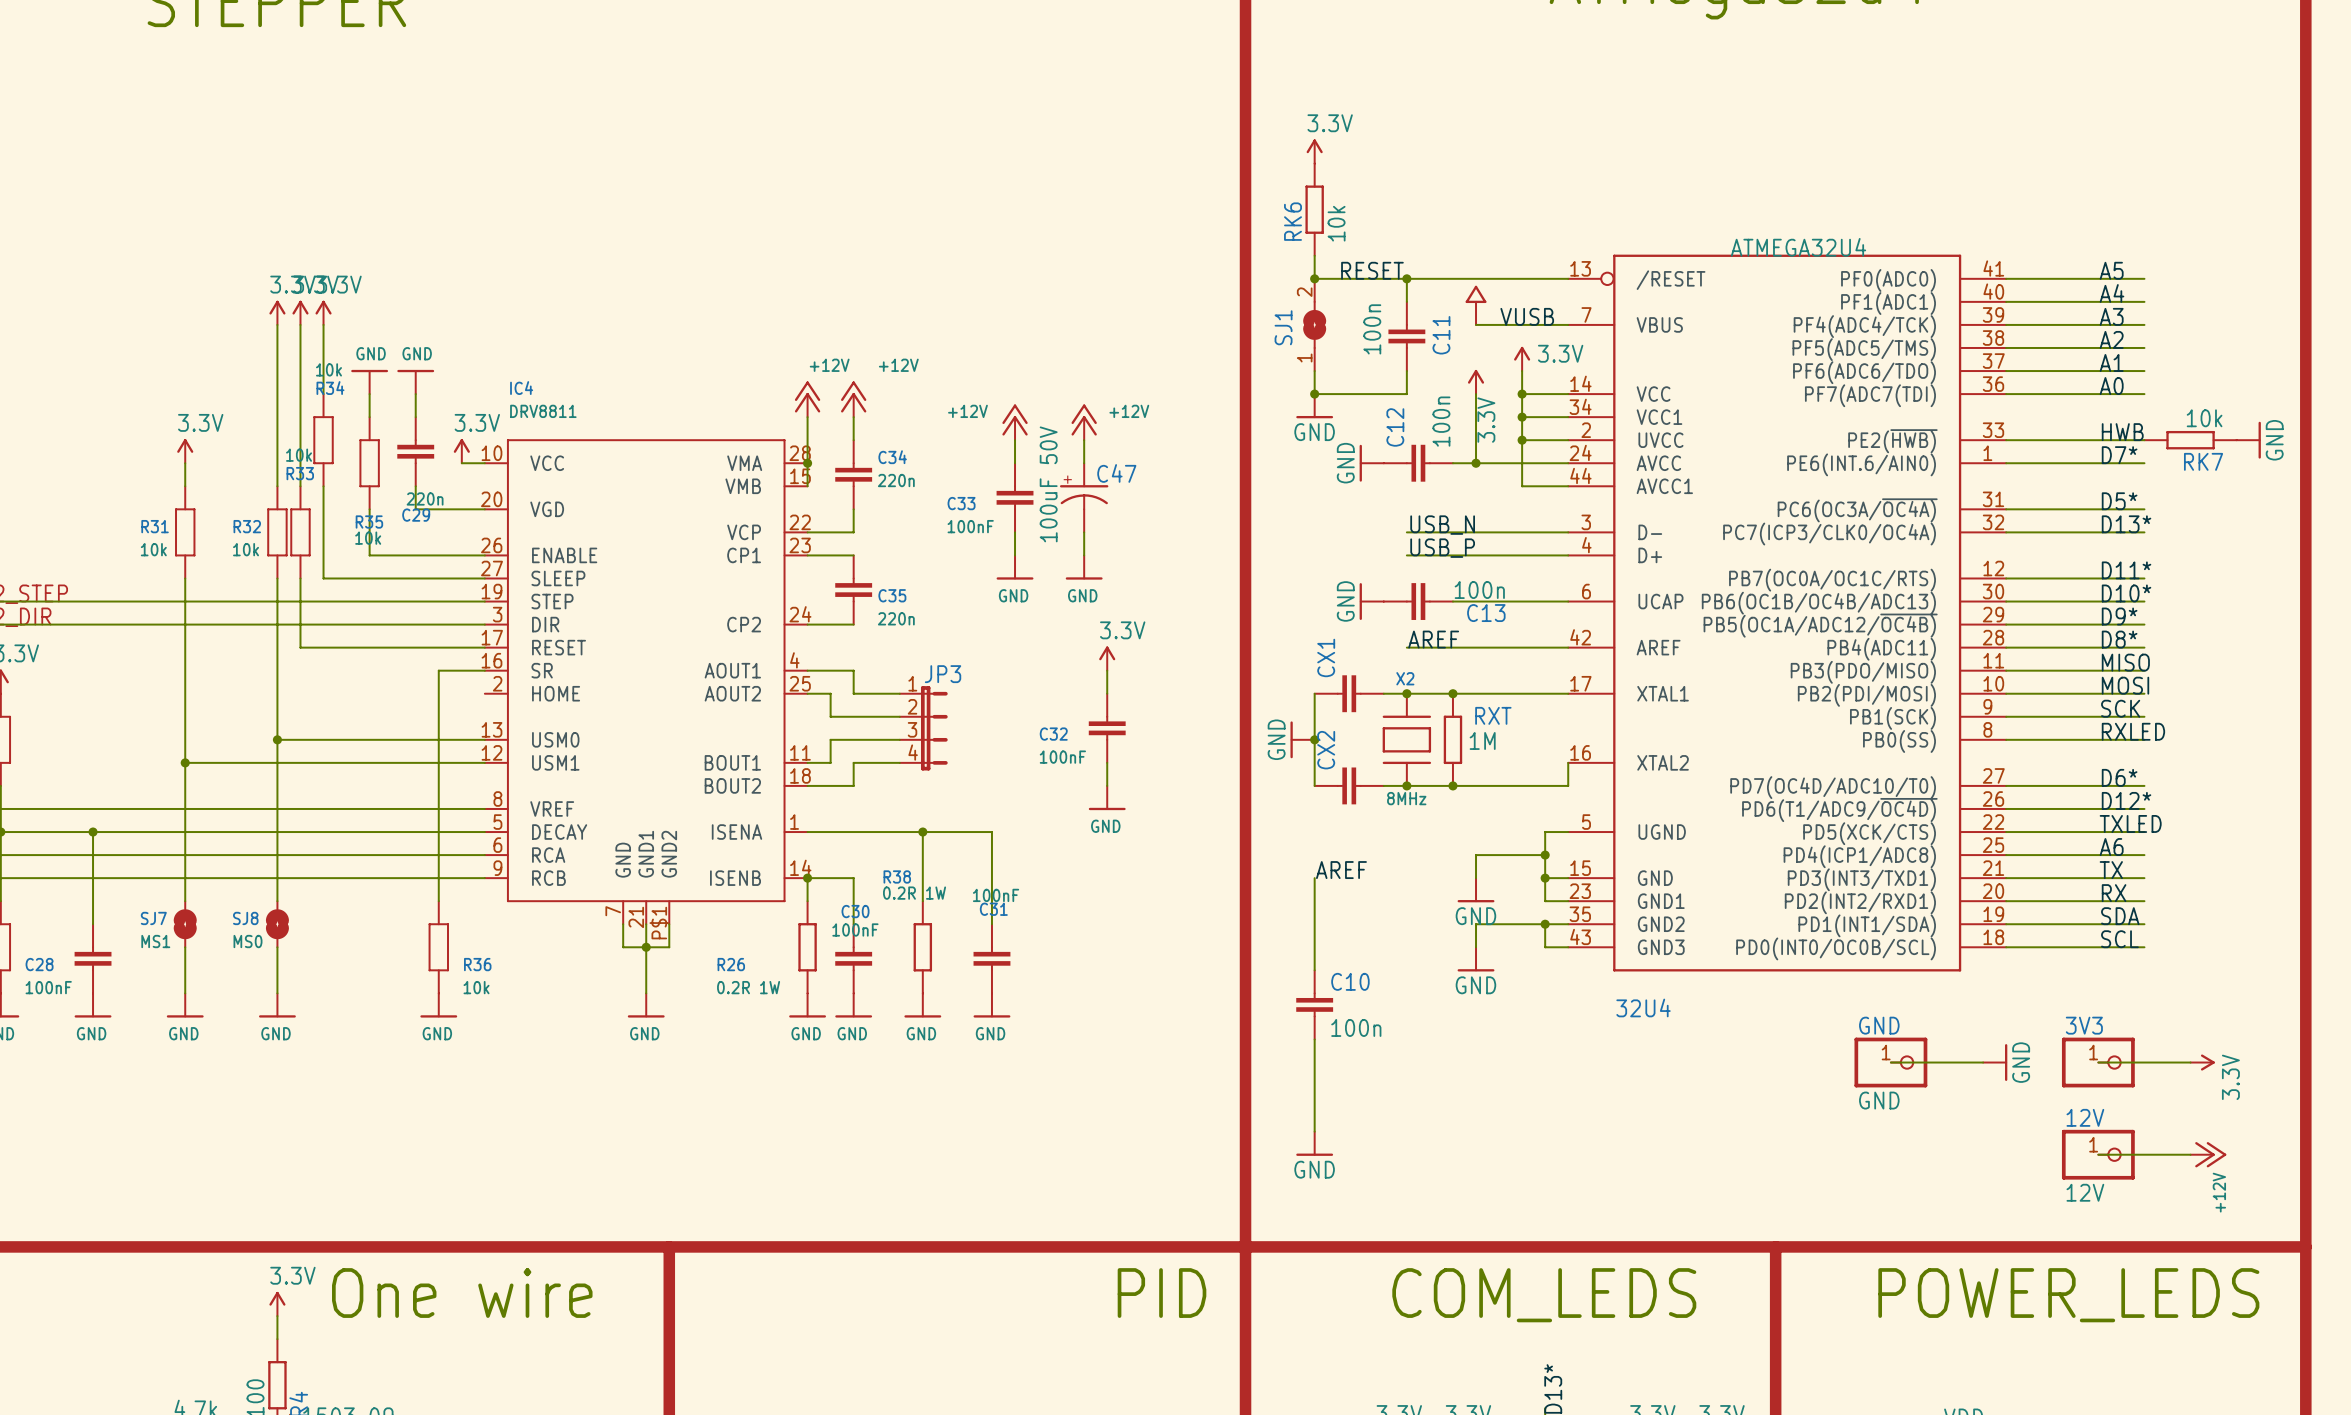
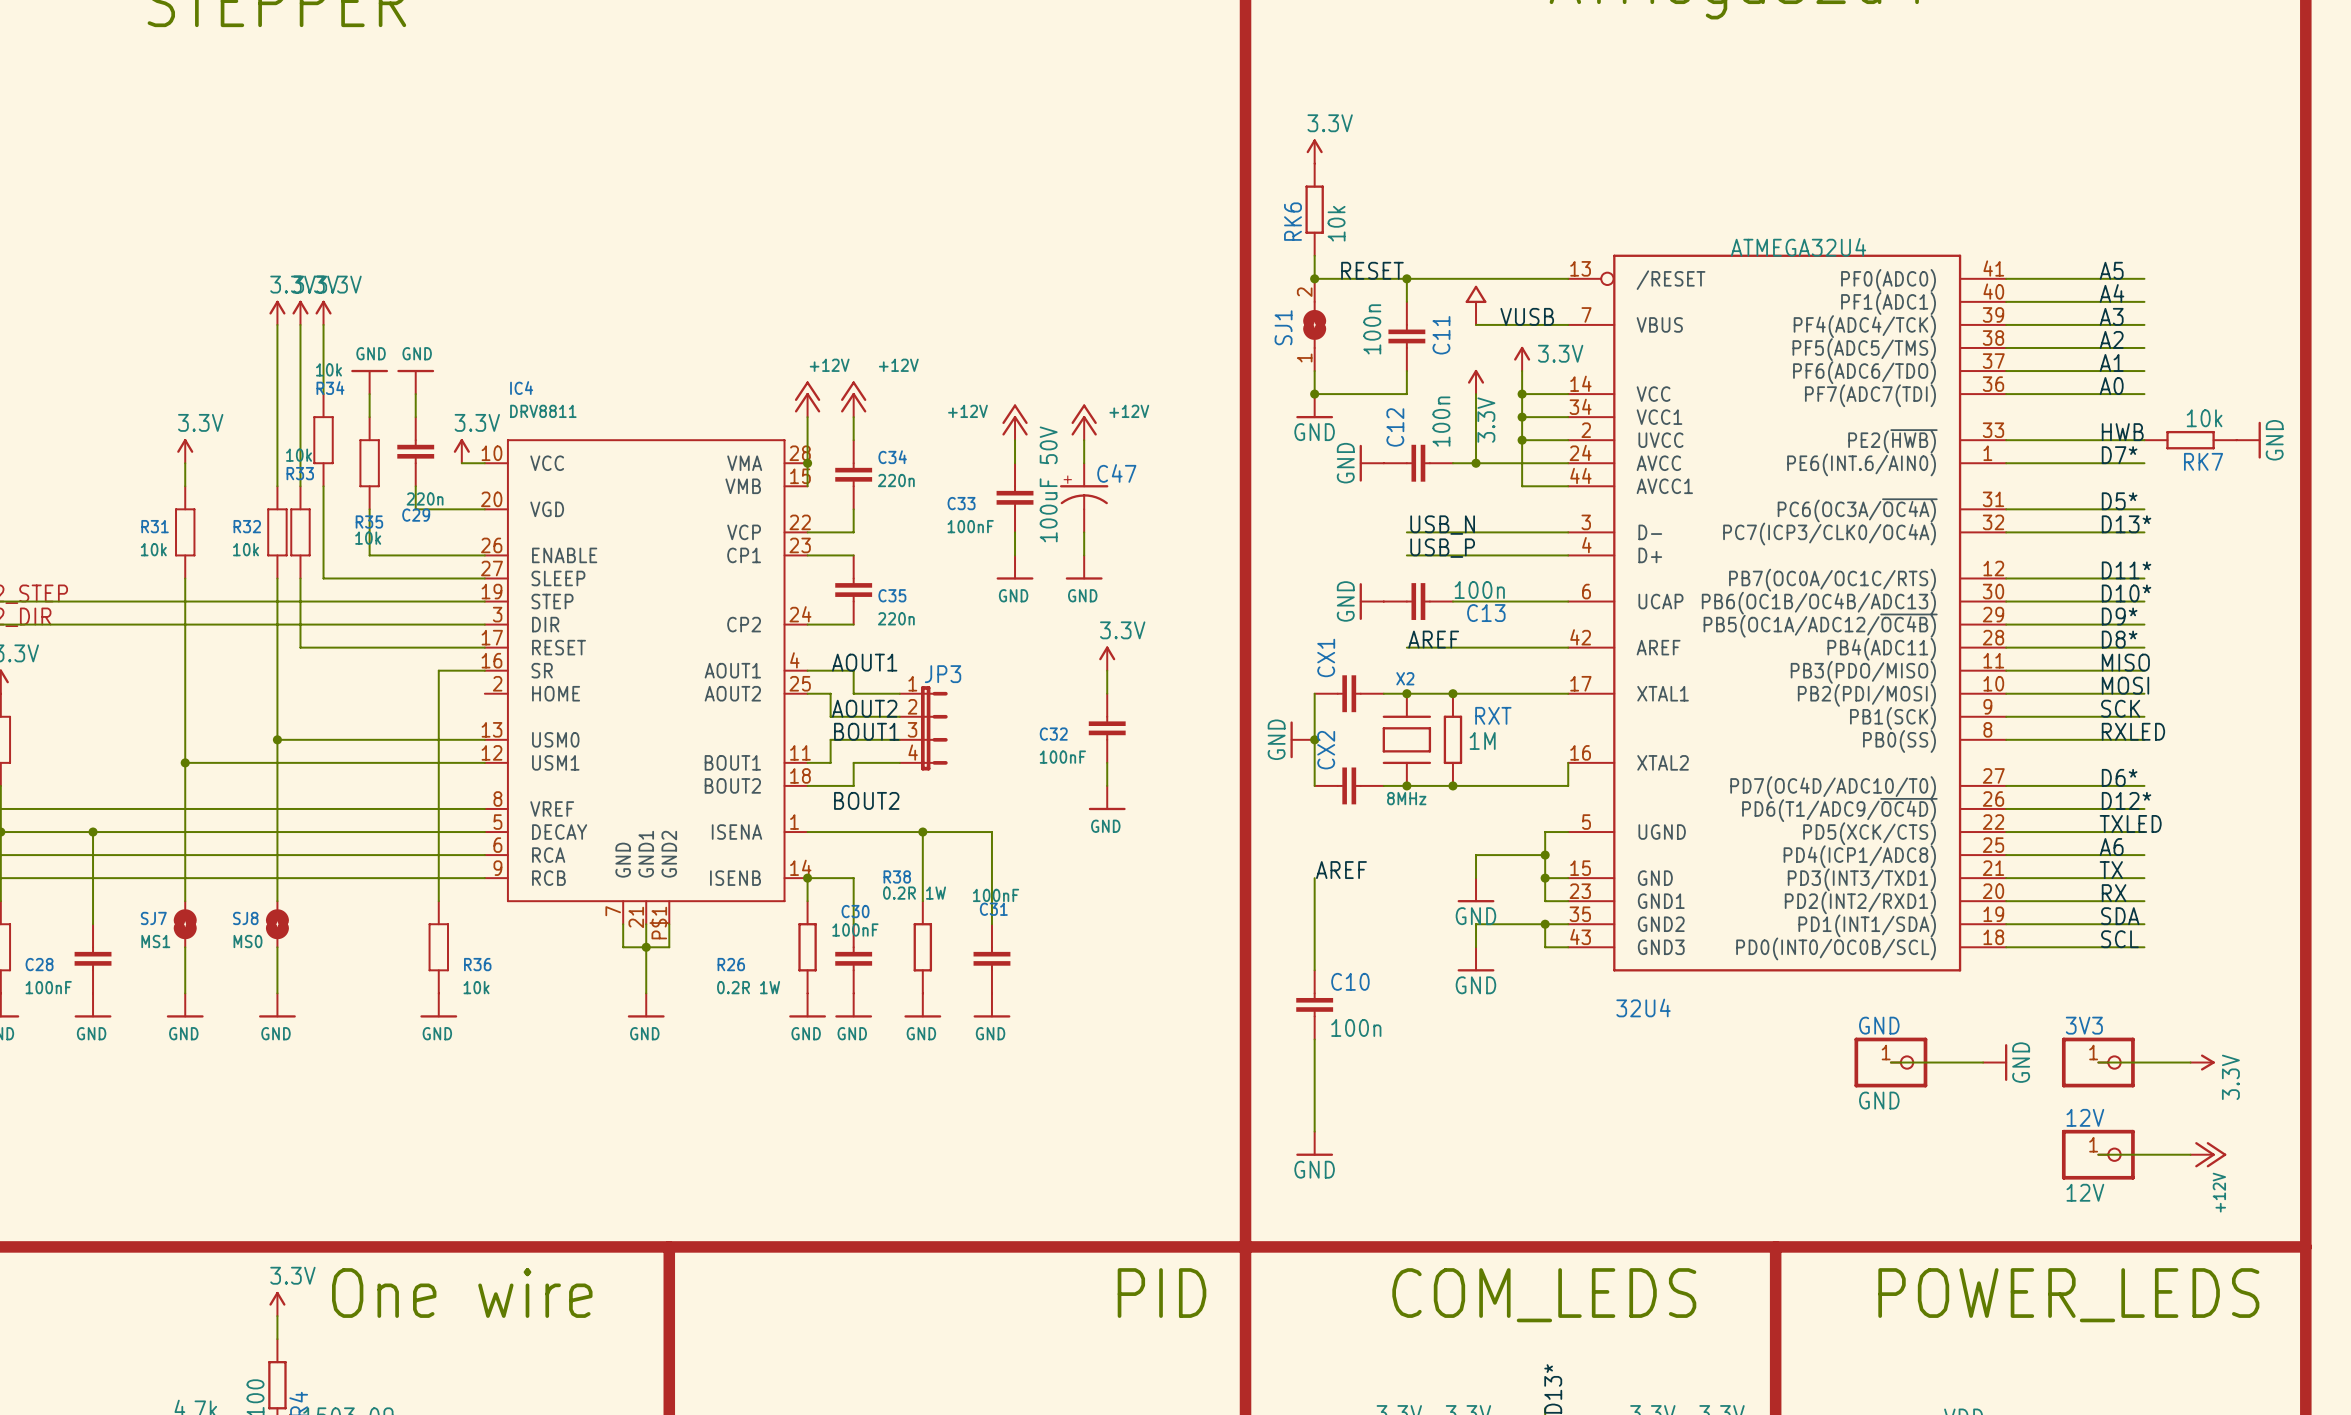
label: none -> AOUT1 (864, 662)
label: none -> AOUT2 (864, 708)
label: none -> BOUT1 (866, 731)
label: none -> BOUT2 (866, 800)

